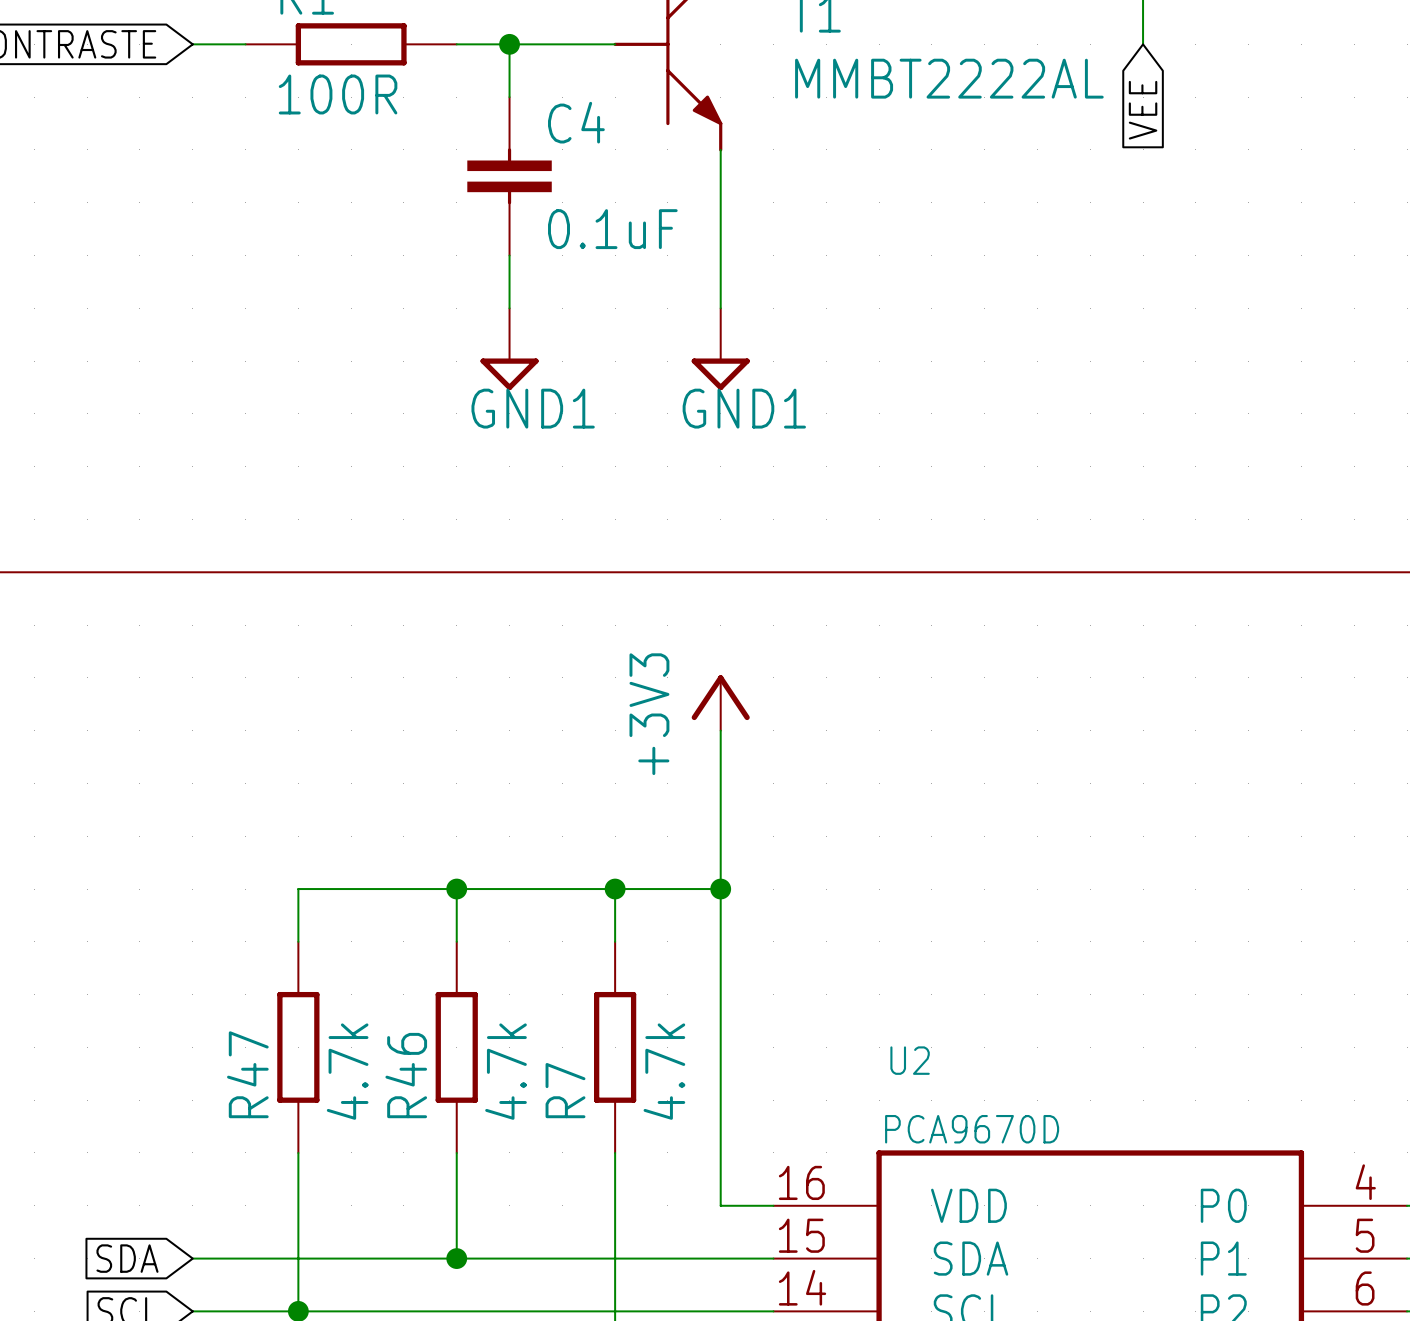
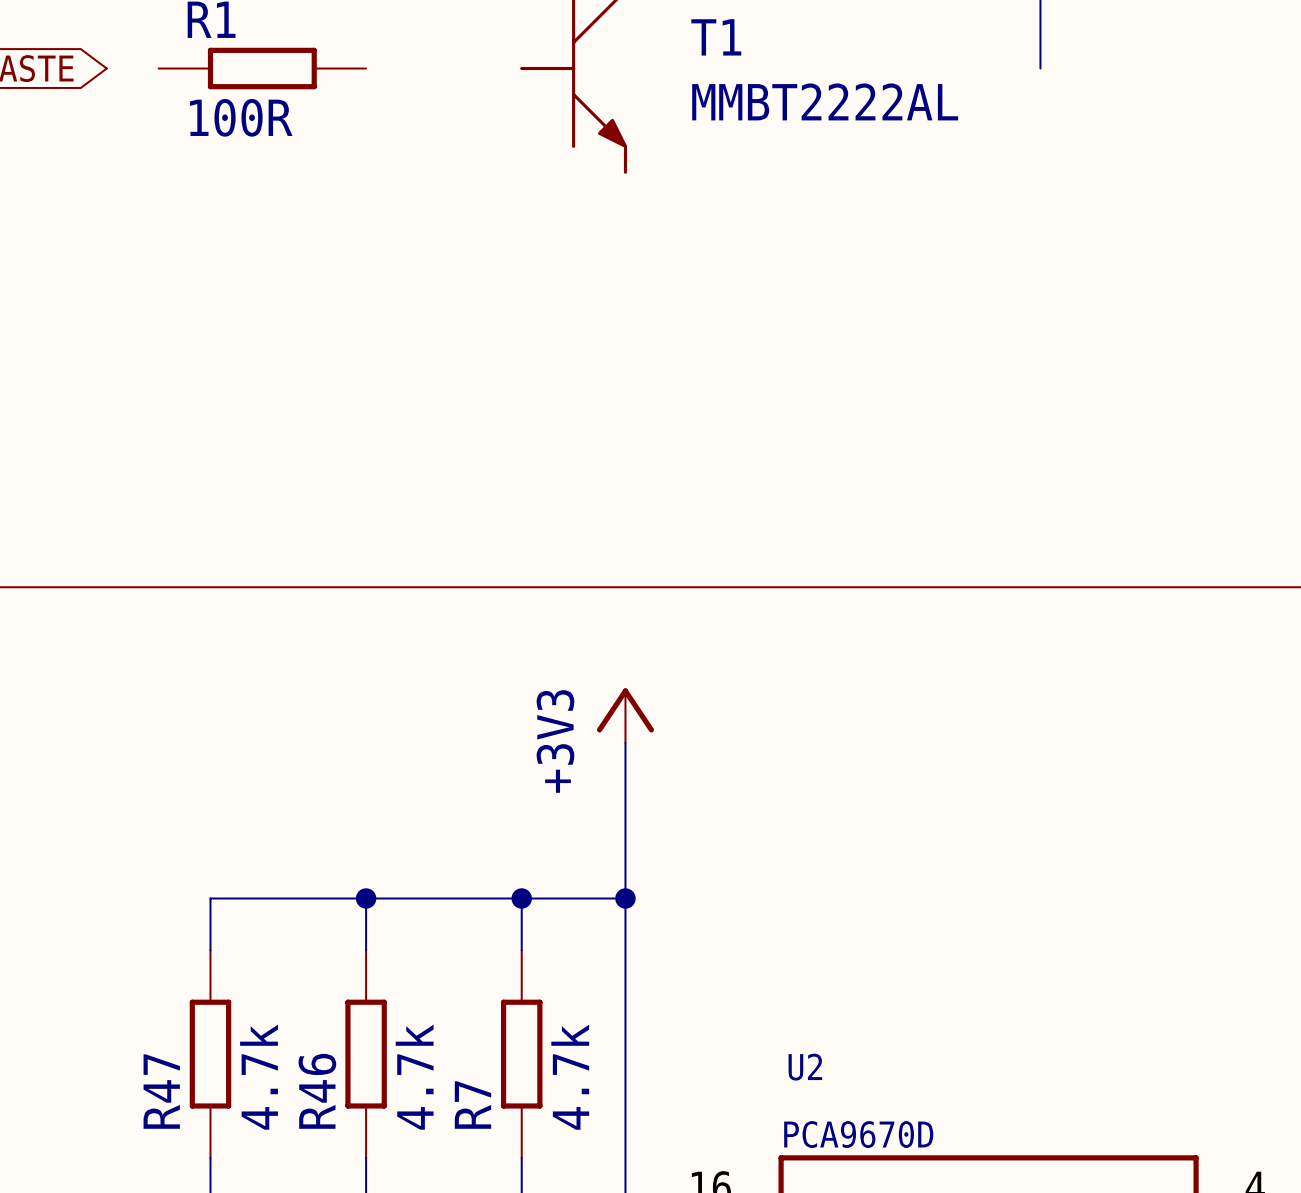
wire: (192, 44) (245, 44) -> none
wire: (456, 44) (615, 44) -> none
wire: (509, 44) (509, 97) -> none
junction: (509, 44) -> none
global label: VEE (1143, 110) -> none
wire: (720, 149) (720, 308) -> none
C4: 0.1uF (509, 176) -> none
wire: (509, 255) (509, 308) -> none
power symbol: GND1 (509, 349) -> none
power symbol: GND1 (720, 349) -> none

